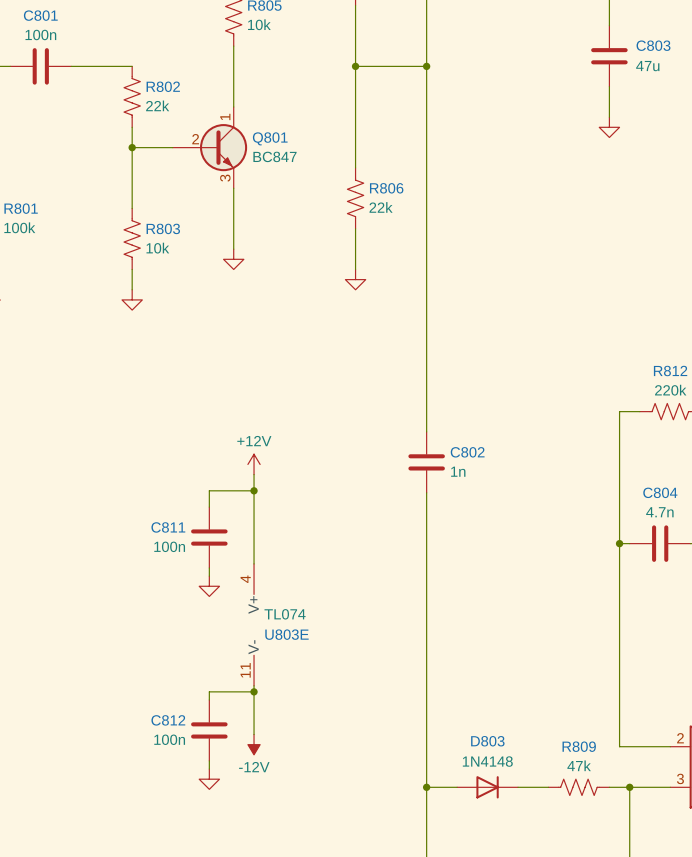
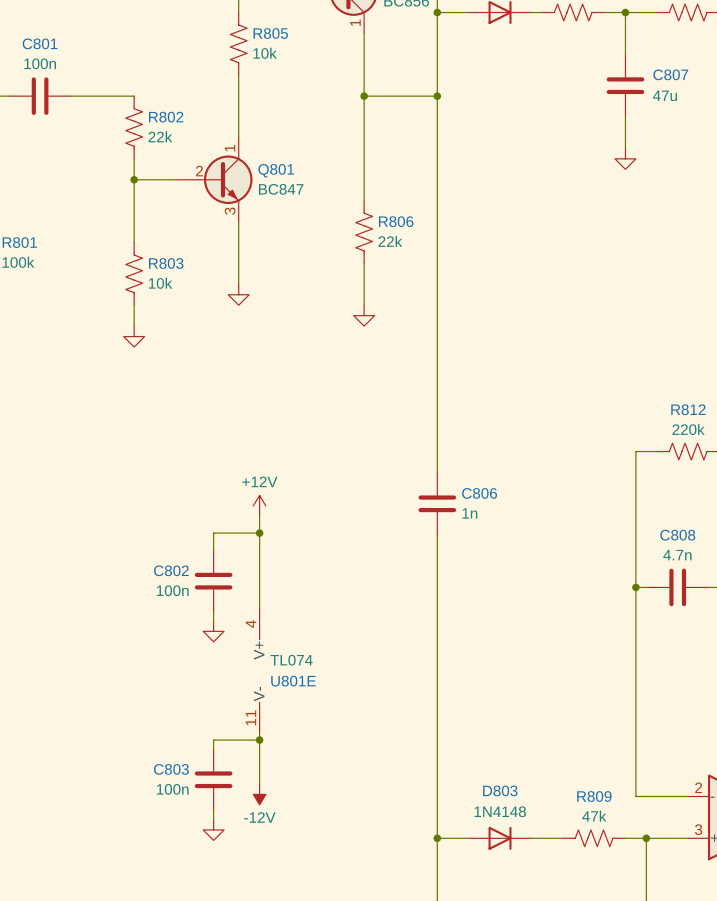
C803 name: C803 (653, 45) -> C807 (670, 74)
C802 name: C802 (467, 452) -> C806 (479, 493)
C804 name: C804 (660, 492) -> C808 (677, 535)
C811 name: C811 (168, 527) -> C802 (171, 570)
U803E name: U803E (286, 634) -> U801E (293, 681)
C812 name: C812 (168, 720) -> C803 (171, 769)

